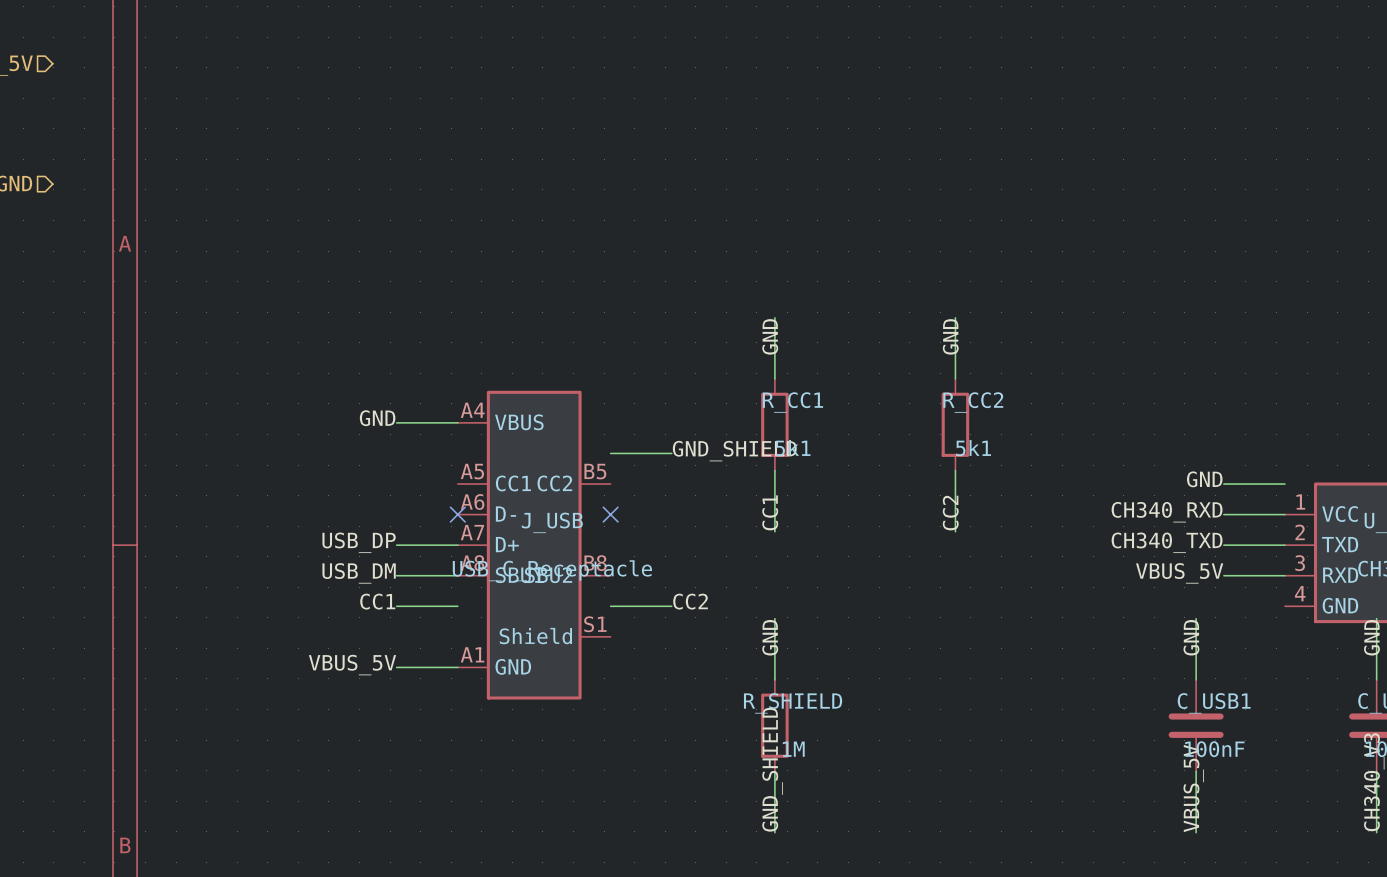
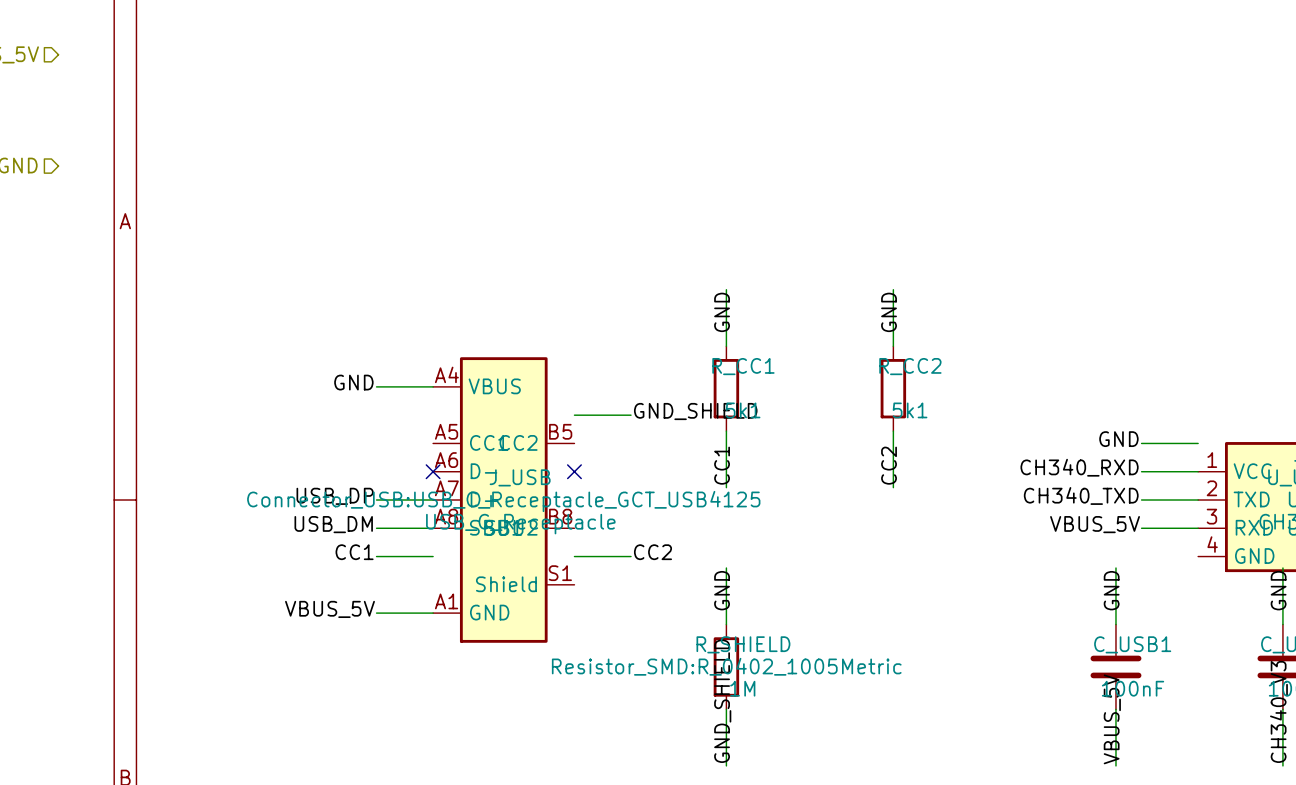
J_USB text: none -> Connector_USB:USB_C_Receptacle_GCT_USB4125 (503, 501)
R_SHIELD text: none -> Resistor_SMD:R_0402_1005Metric (726, 666)

